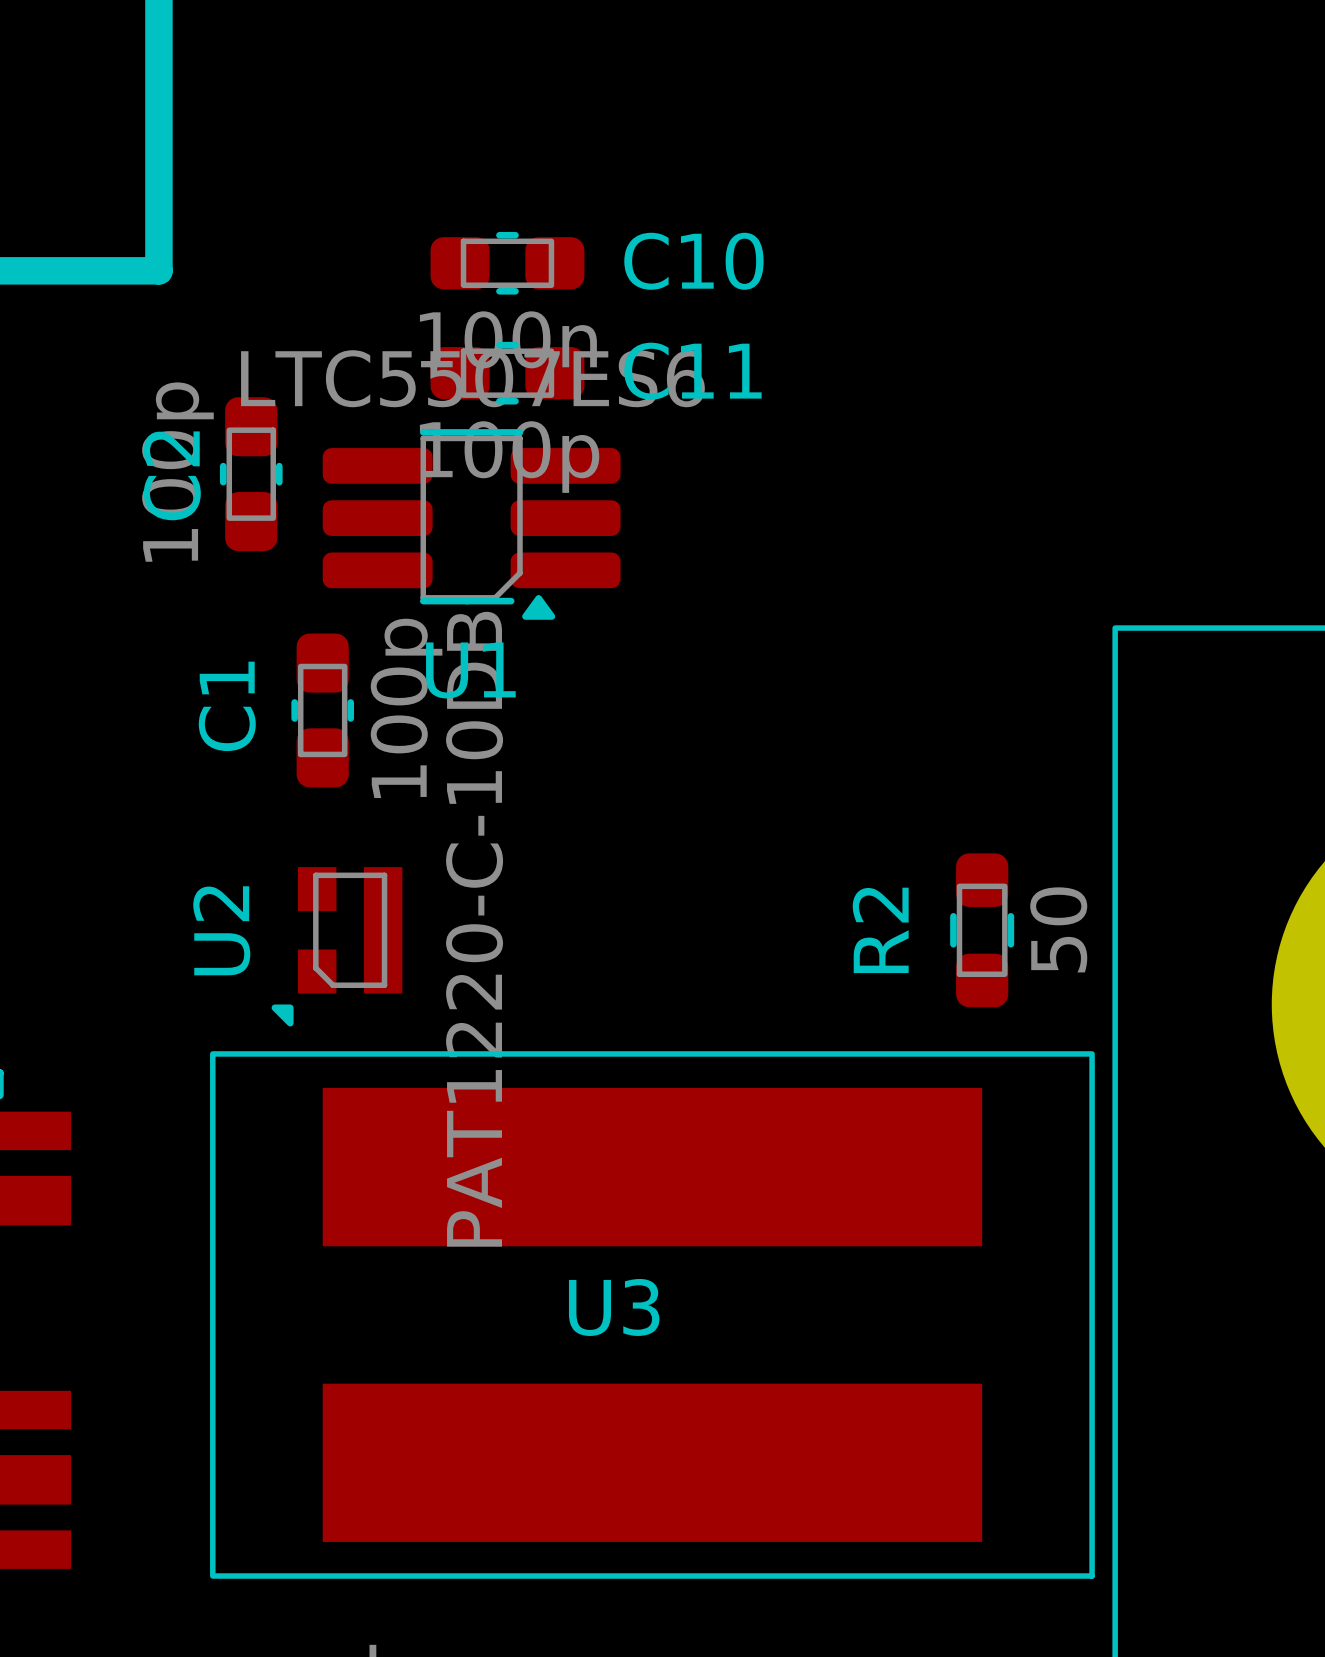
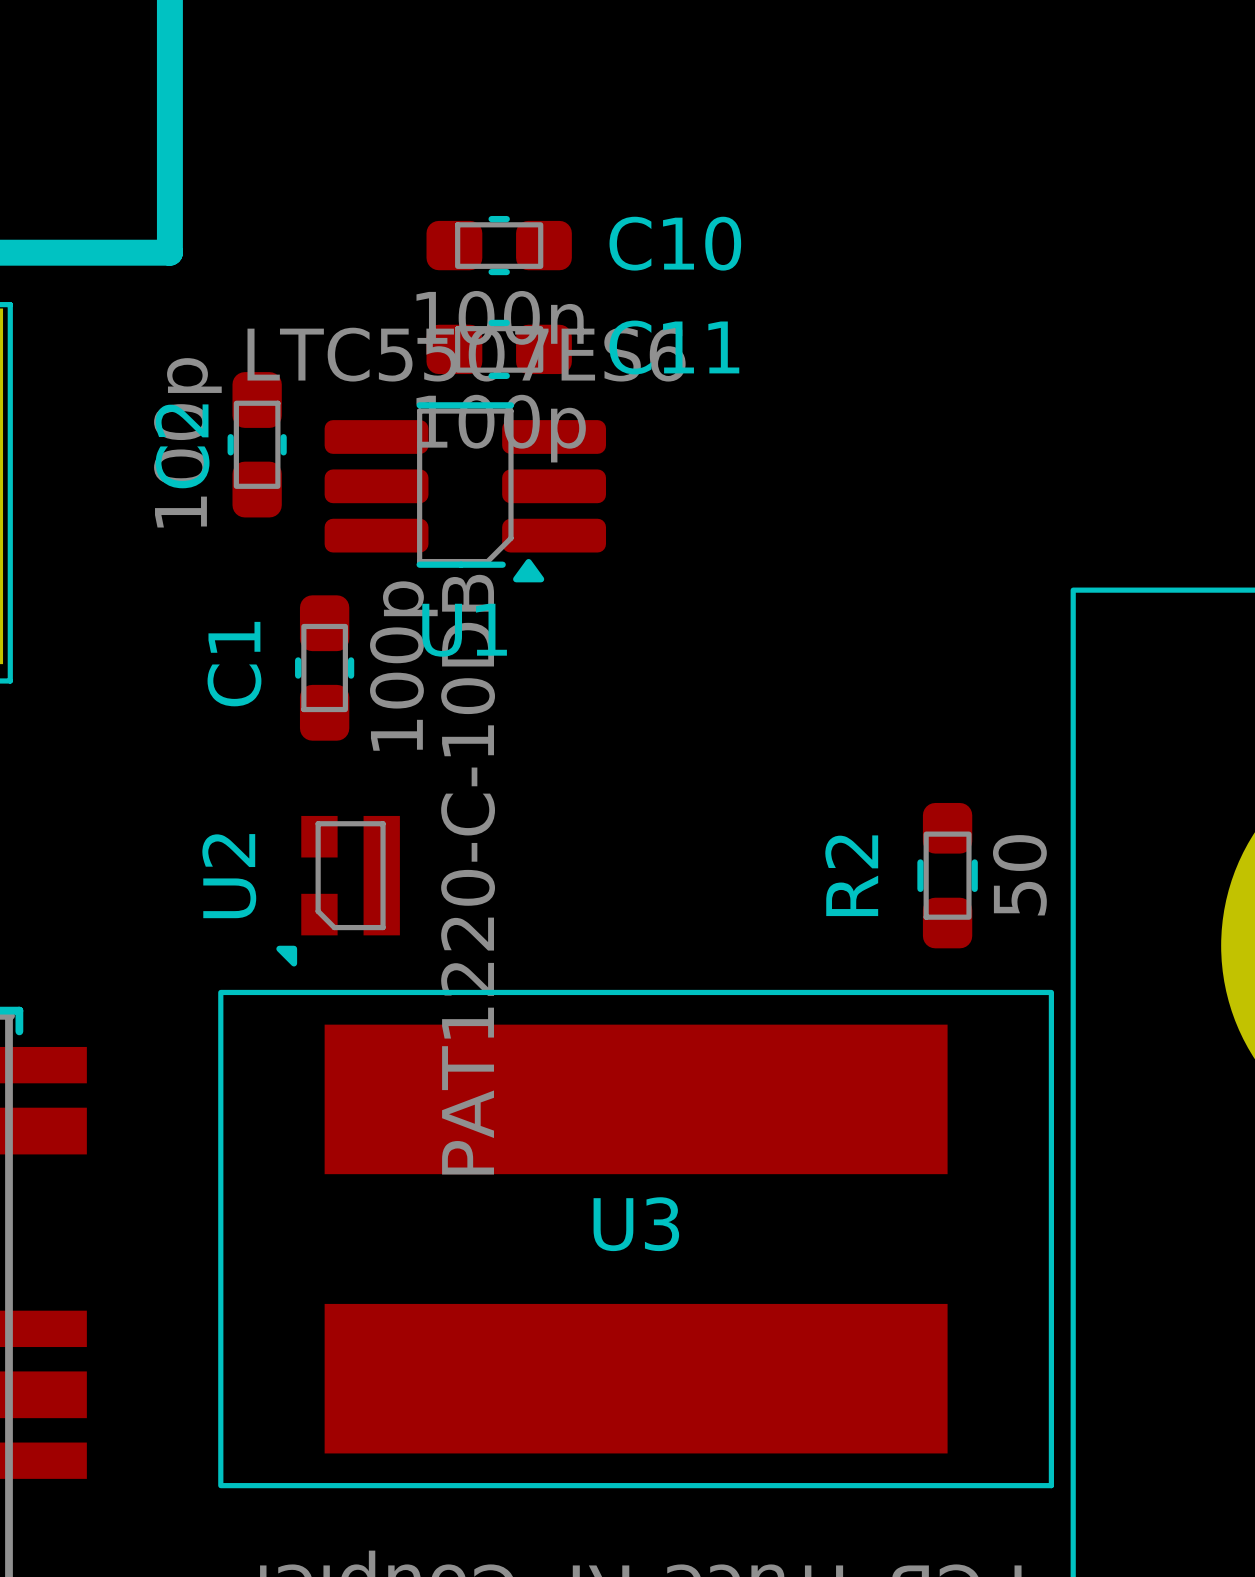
U3 name position: U3 (614, 1307) -> U3 (636, 1224)

